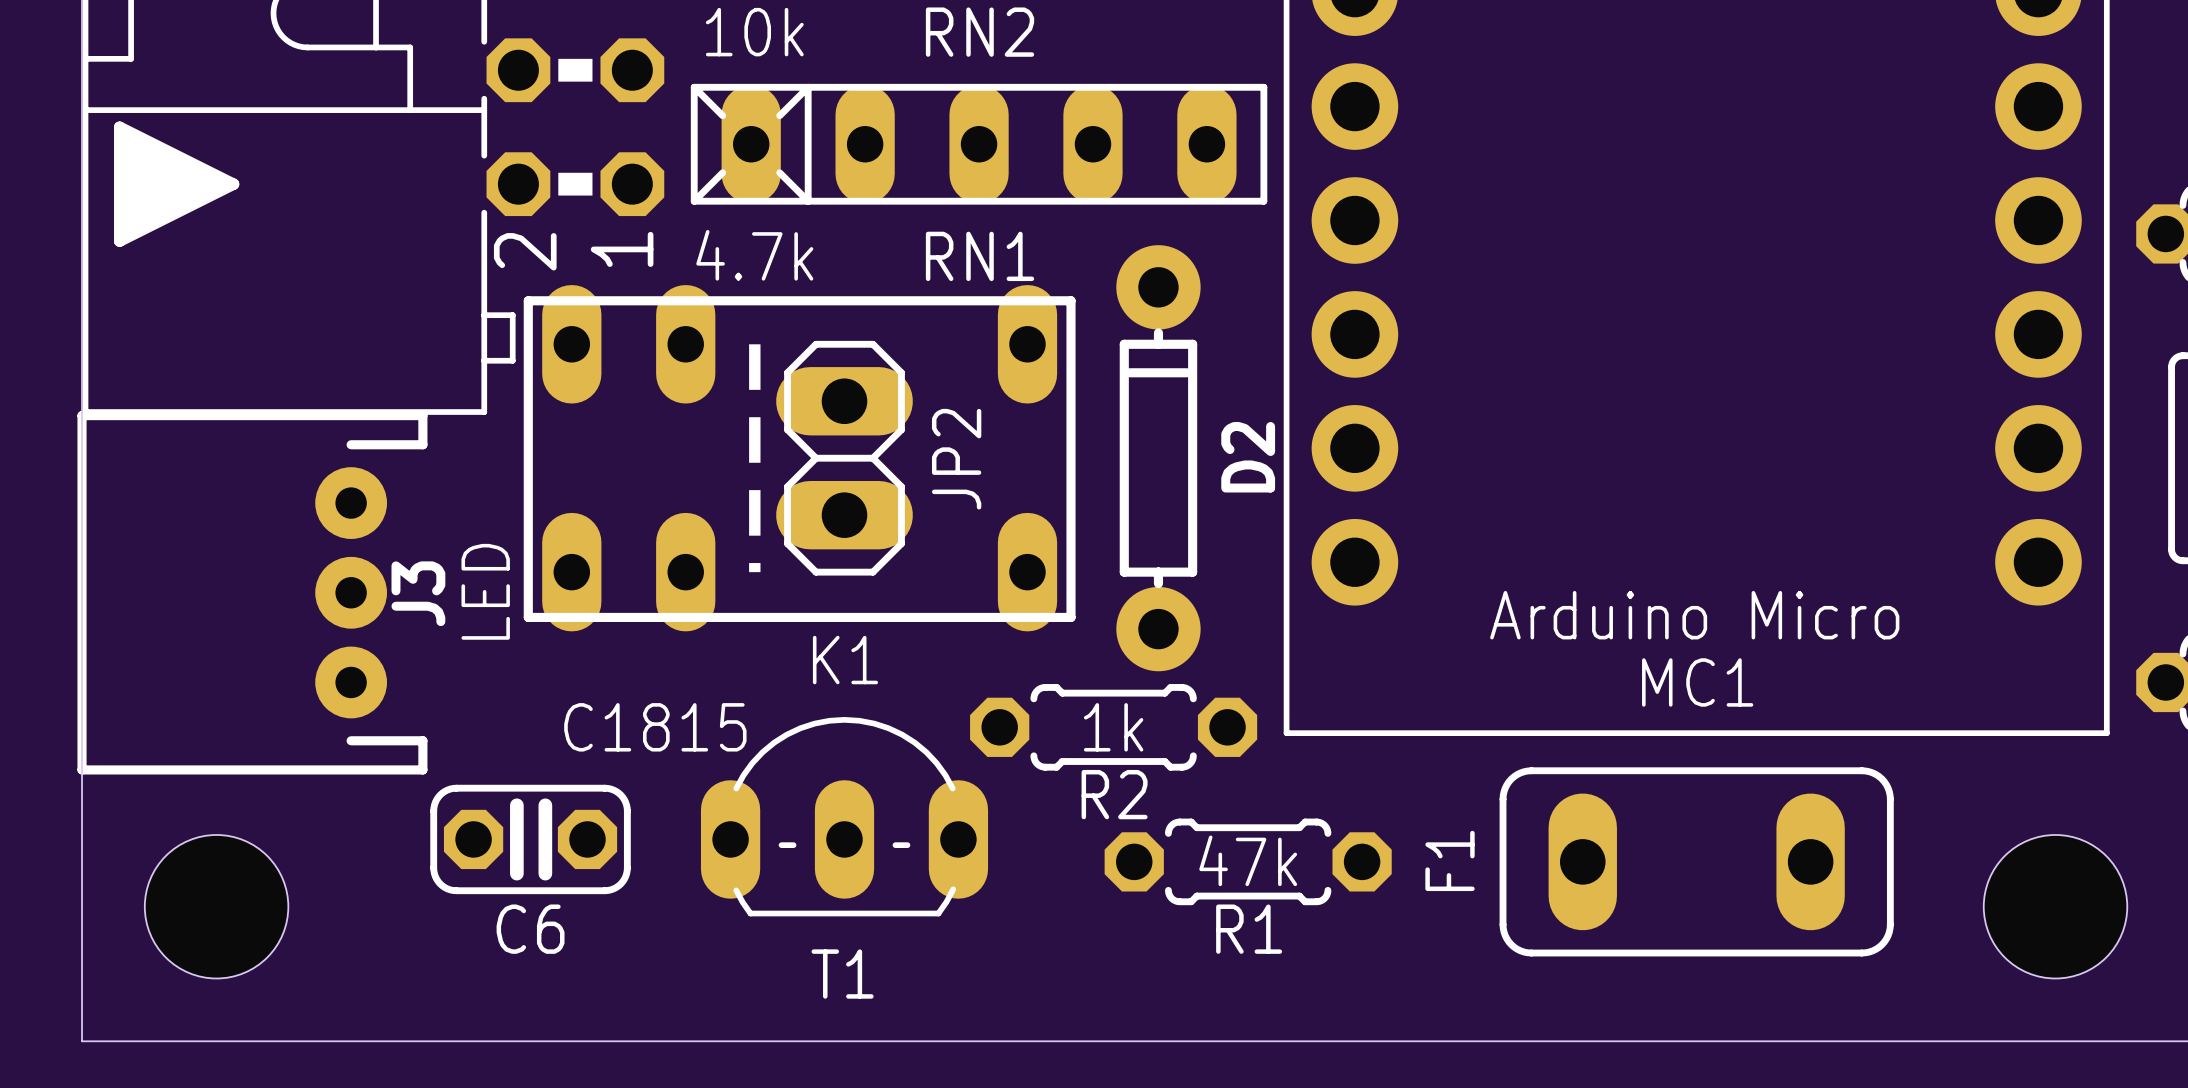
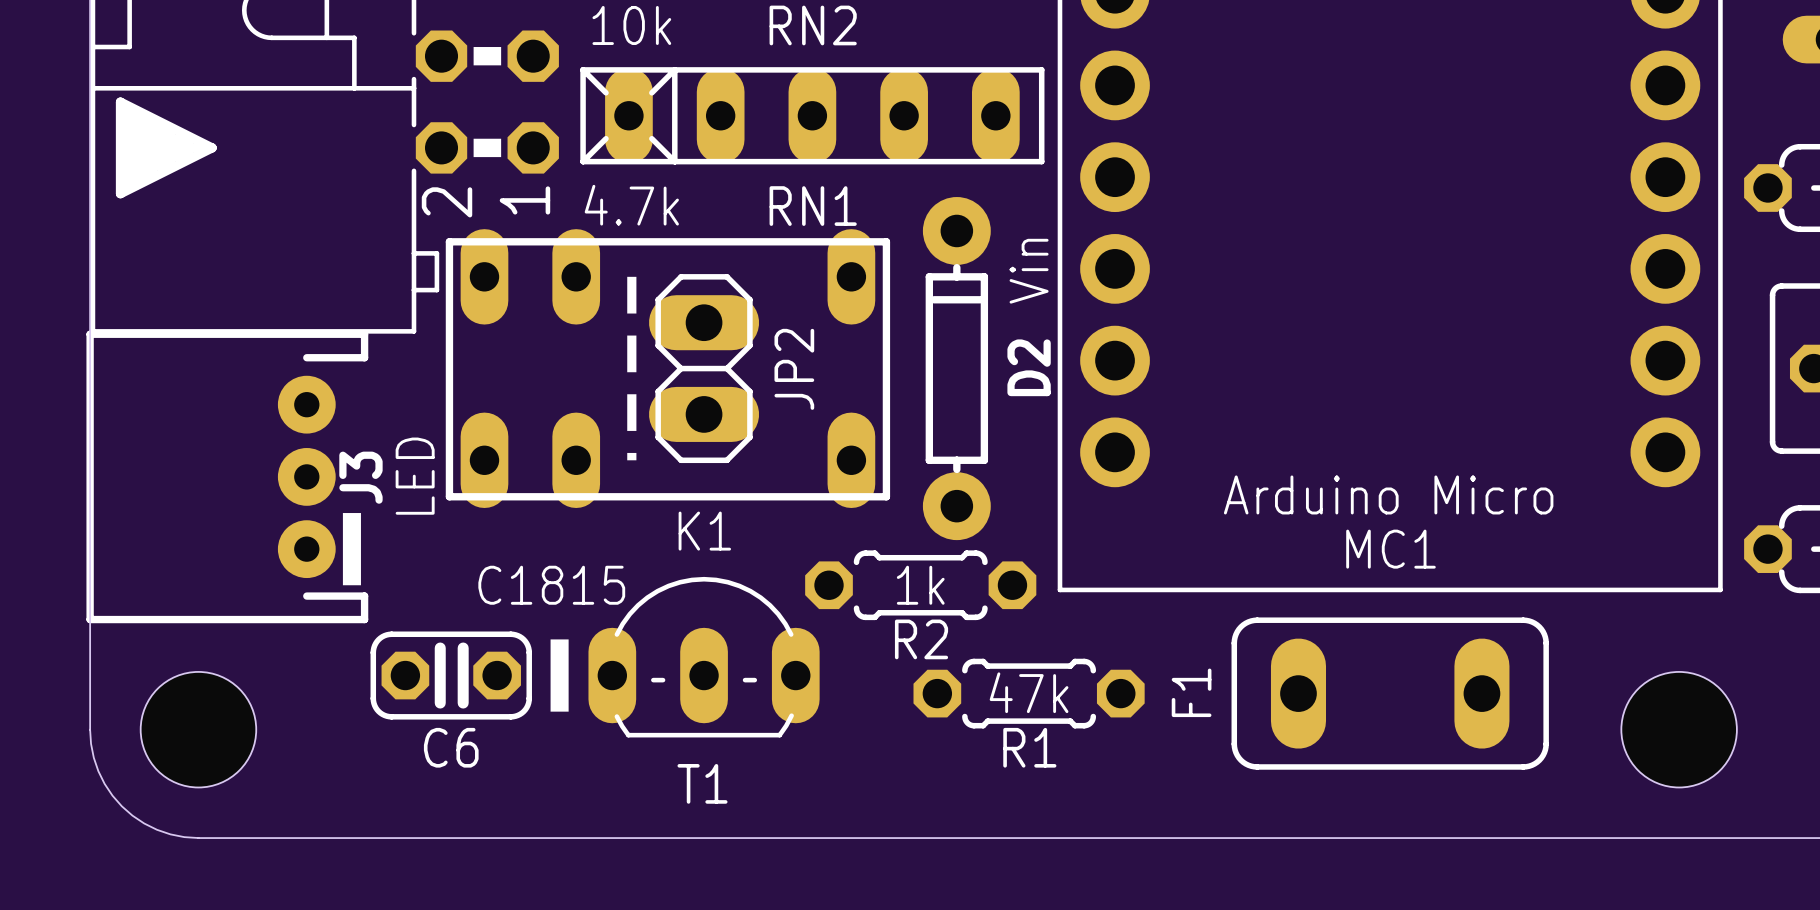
text: none -> Vin (1029, 271)
drawing: none -> [342, 513, 361, 586]
drawing: none -> [550, 639, 569, 712]
board edge: (82, 906) (82, 1041) (216, 1041) -> (90, 729) (93, 757) (98, 771) (112, 795) (121, 806) (132, 815) (156, 829) (170, 834) (198, 838)

